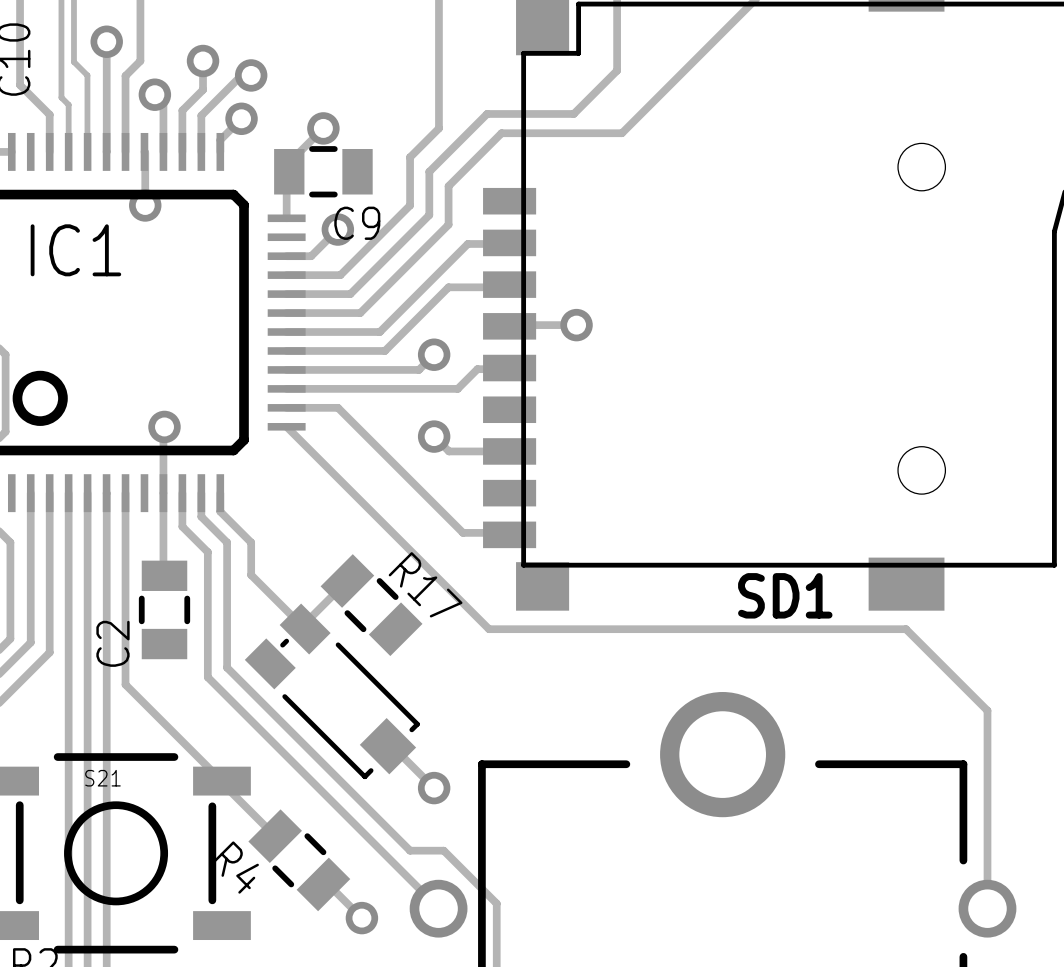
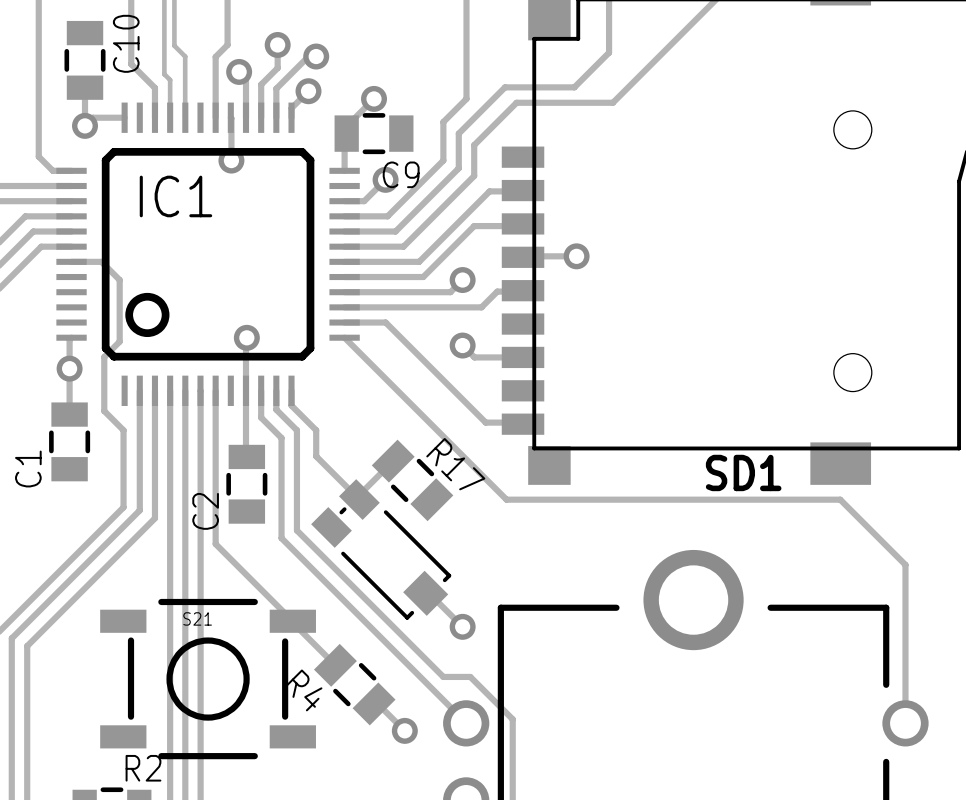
track: (106, 41) (106, 151) -> none
via: (106, 41) -> none

